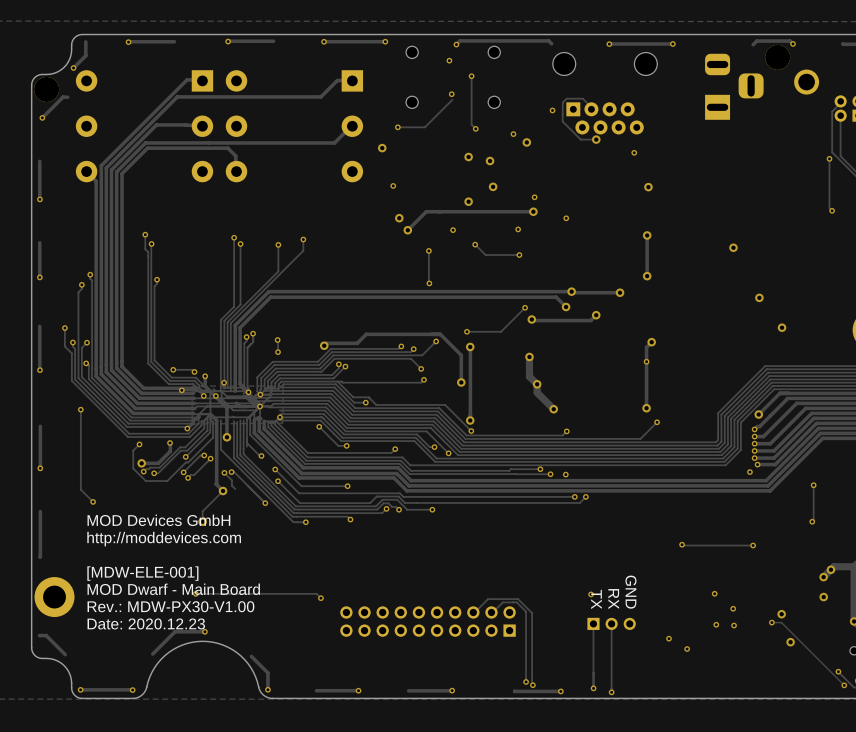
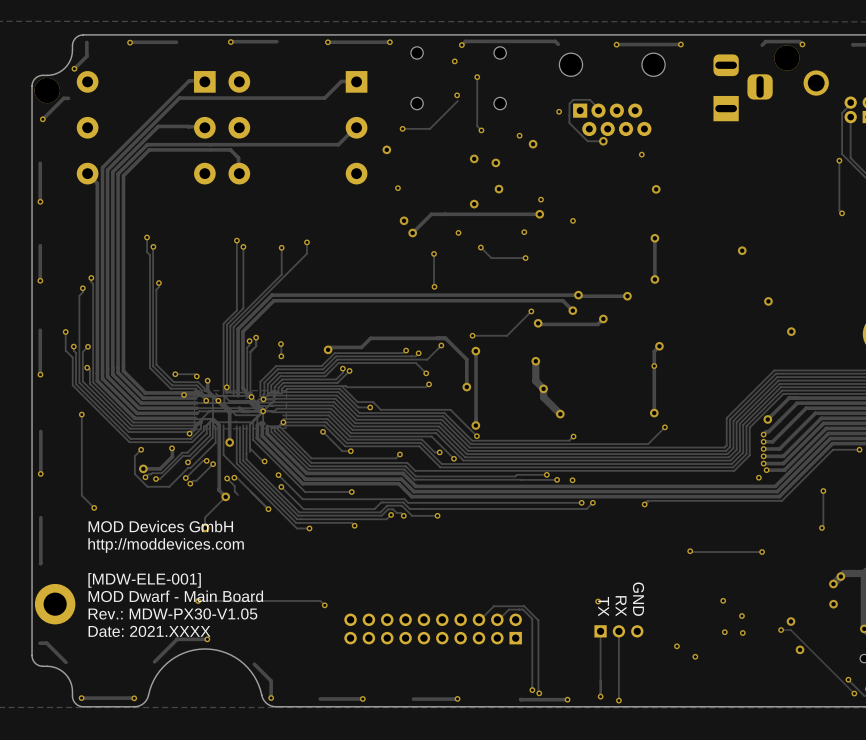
track: none -> (859, 449) (833, 449) (781, 500) (648, 500) (644, 504) (647, 501)
via: none -> (859, 449)
via: none -> (644, 504)
text: Rev.: MDW-PX30-V1.00 (170, 606) -> Rev.: MDW-PX30-V1.05 (172, 613)
text: Date: 2020.12.23 (146, 623) -> Date: 2021.XXXX (149, 631)

